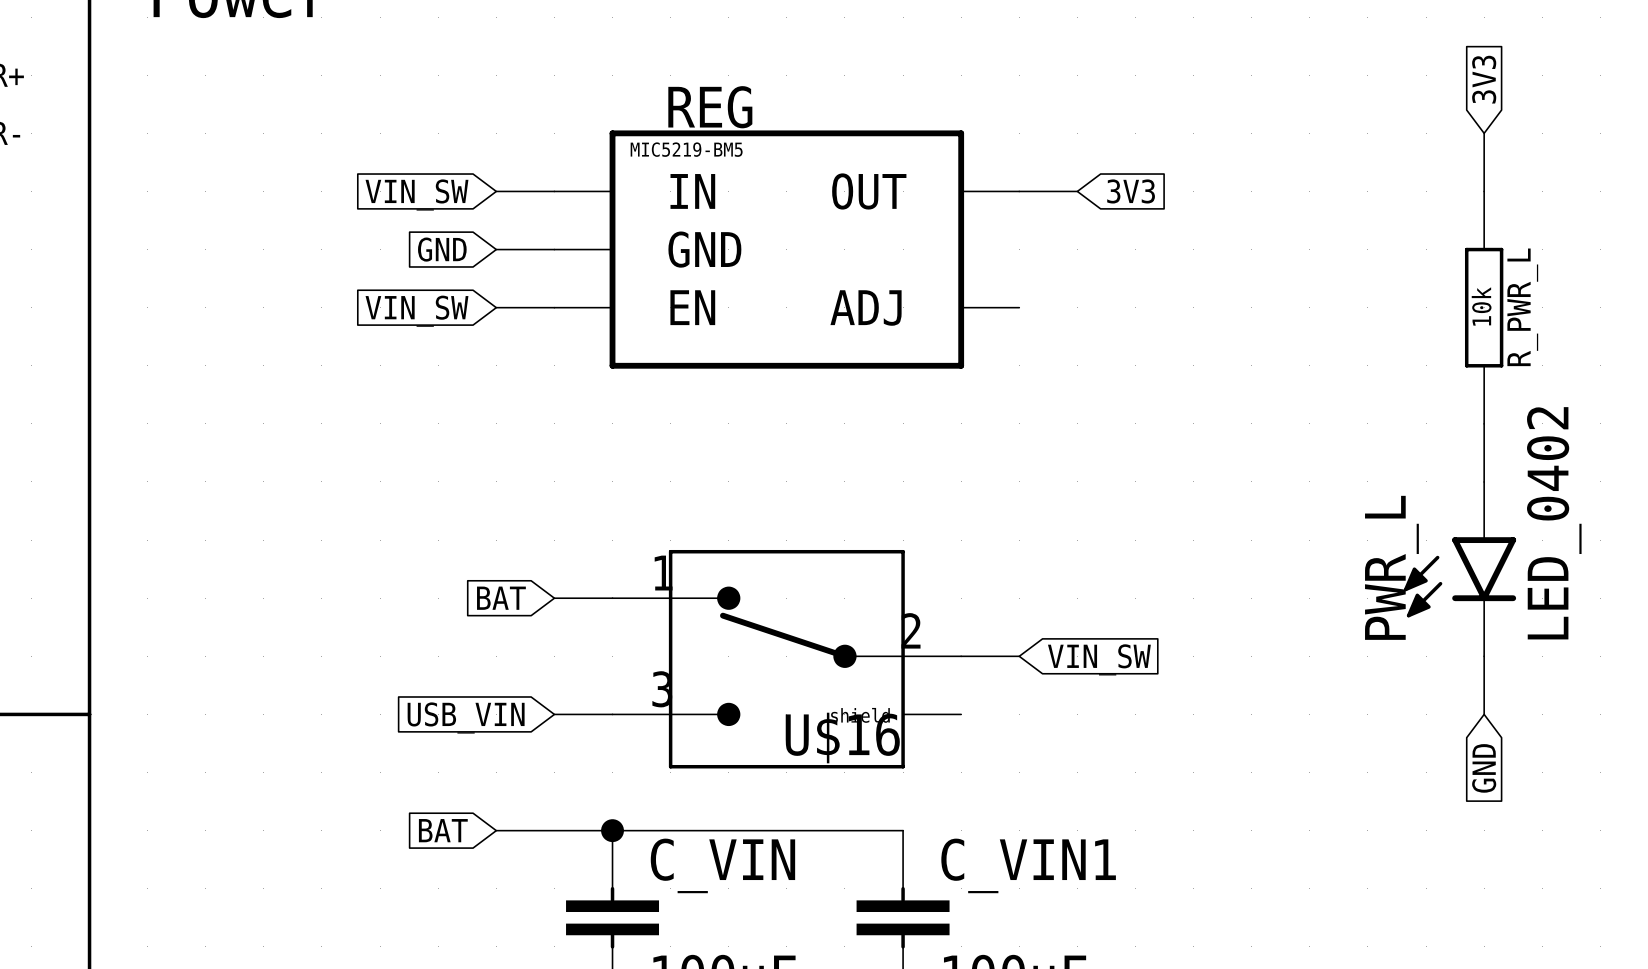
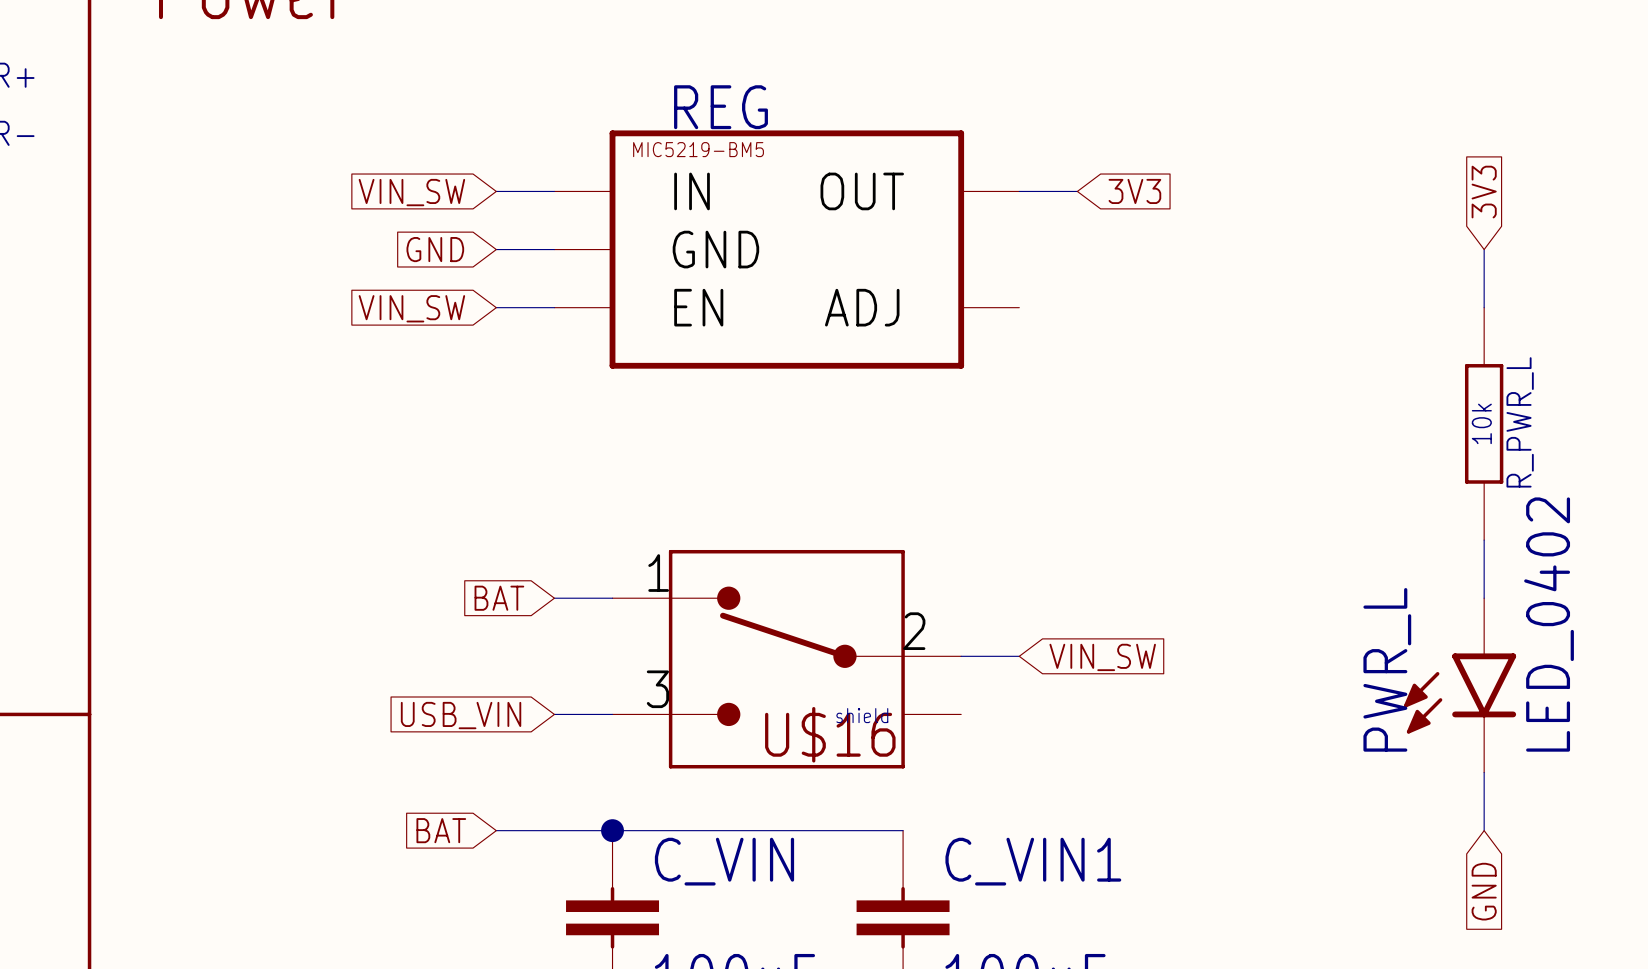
global label position: 3V3 (1484, 79) -> 3V3 (1484, 192)
wire: (1484, 133) (1484, 191) -> (1484, 249) (1484, 307)
R_PWR_L position: (1484, 307) -> (1484, 423)
wire: (1484, 423) (1484, 481) -> (1484, 772) (1484, 830)
PWR_L position: (1460, 569) -> (1460, 685)
wire: (1484, 656) (1484, 714) -> (1484, 540) (1484, 598)
global label position: GND (1484, 768) -> GND (1484, 891)

